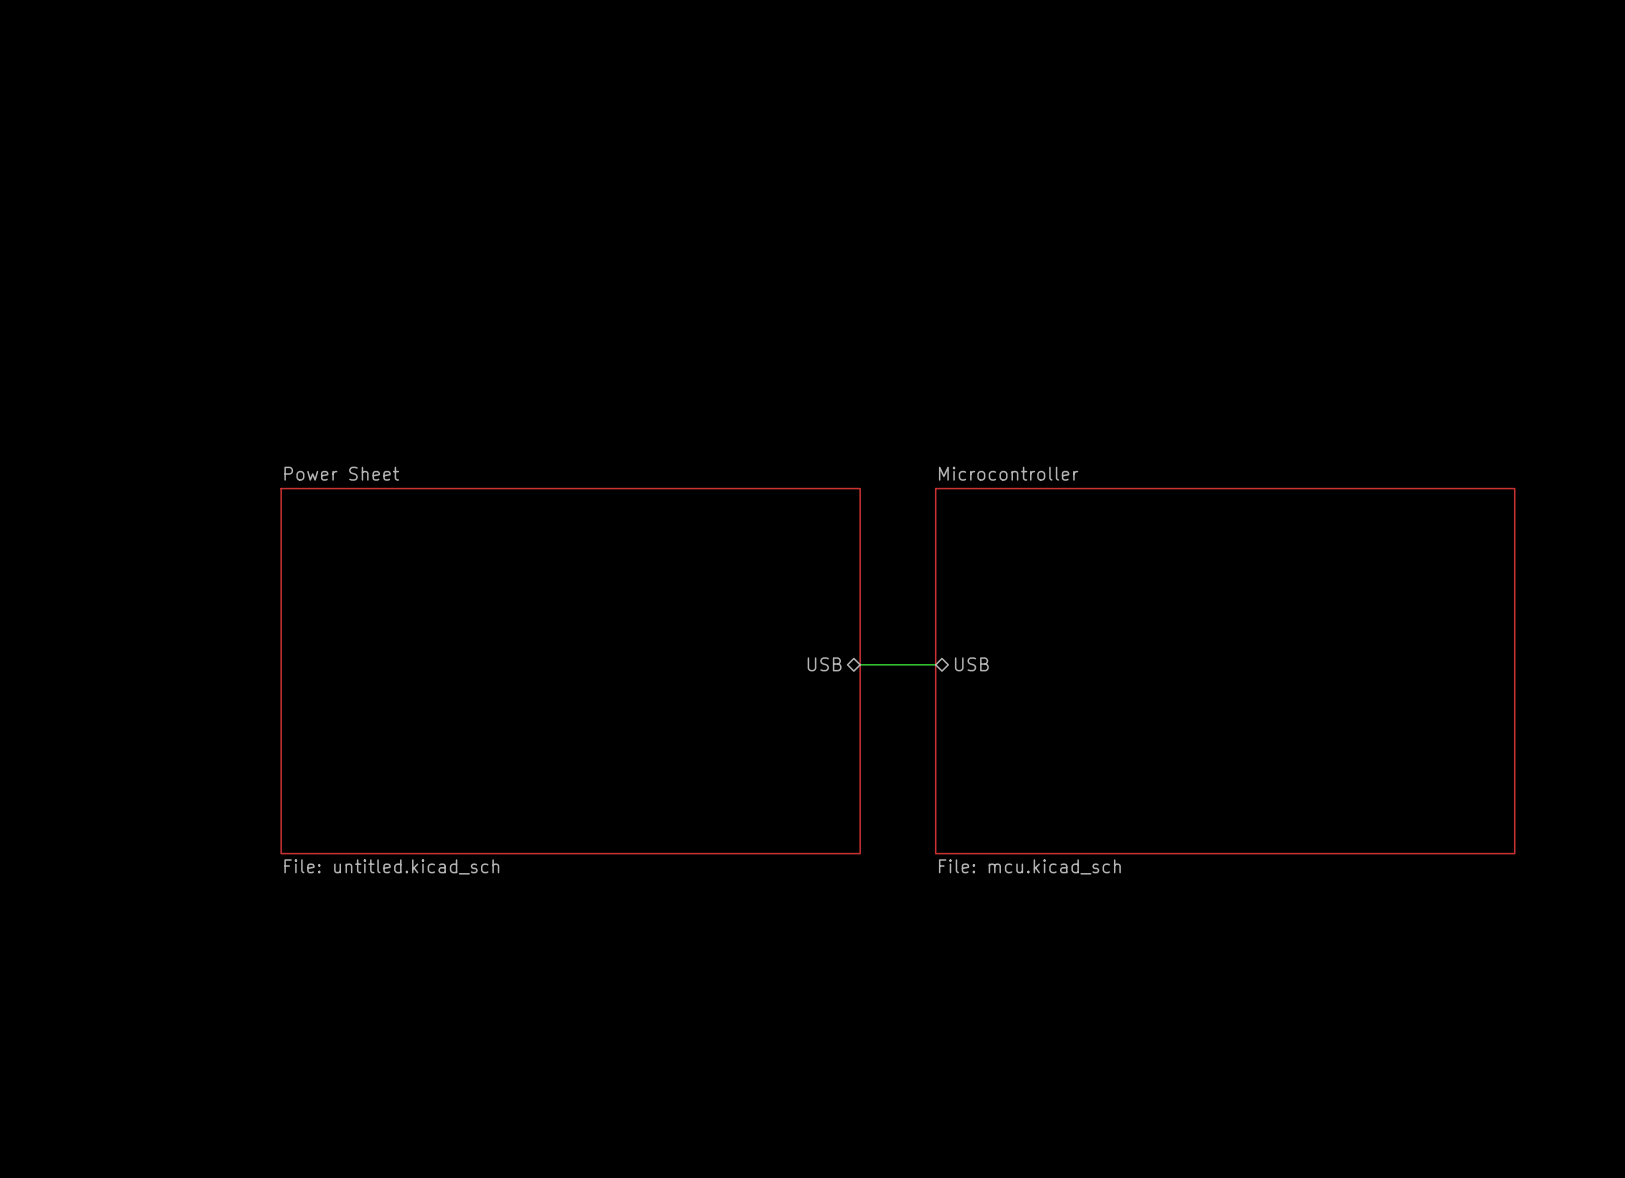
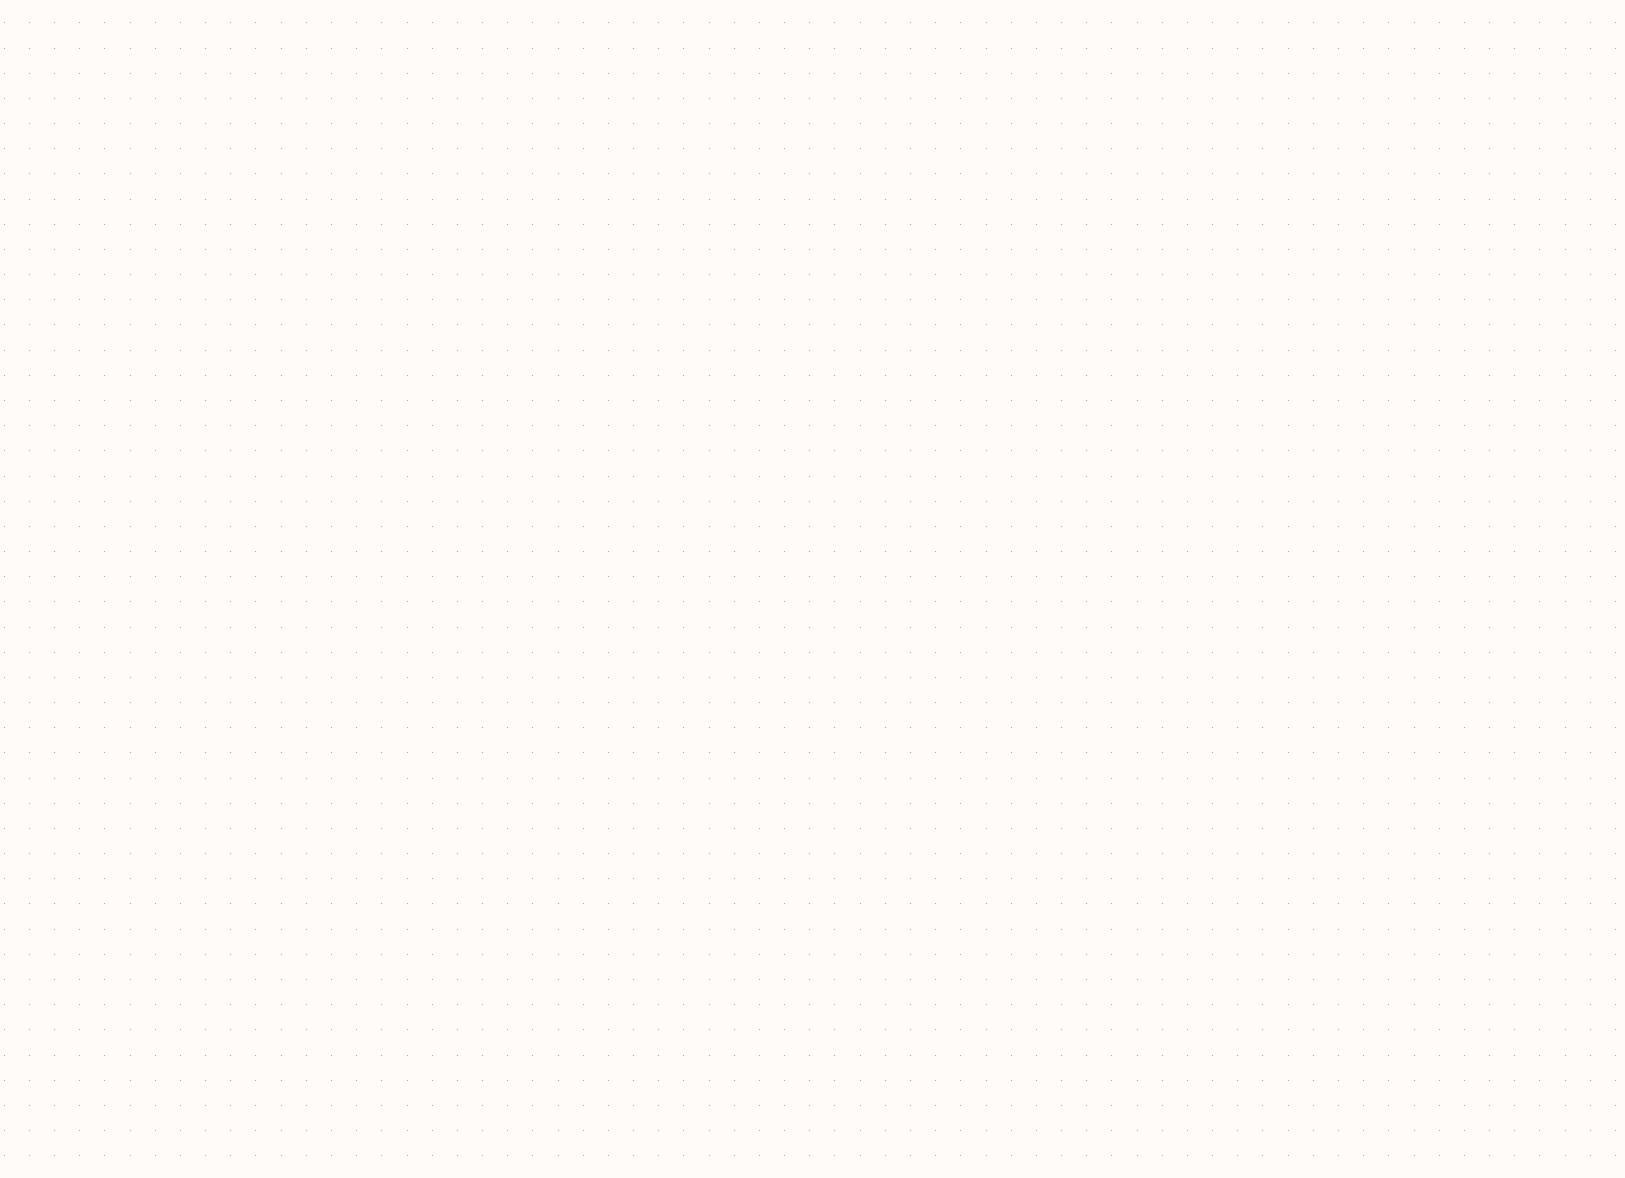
sheet pin: USB (824, 664) -> none
wire: (860, 664) (935, 664) -> none
sheet pin: USB (971, 664) -> none
sheet Power Sheet: File: untitled.kicad_sch (570, 671) -> none
sheet Microcontroller: File: mcu.kicad_sch (1225, 671) -> none

